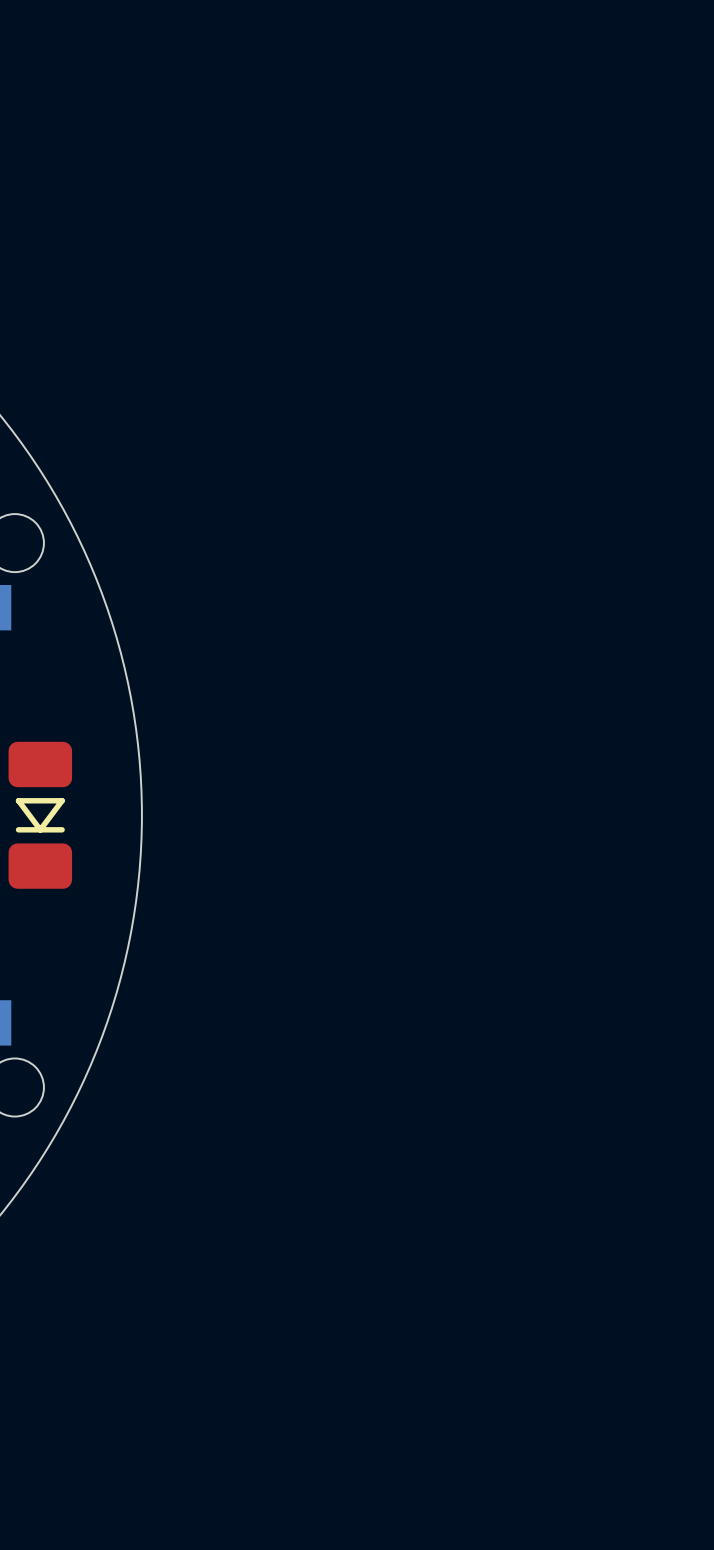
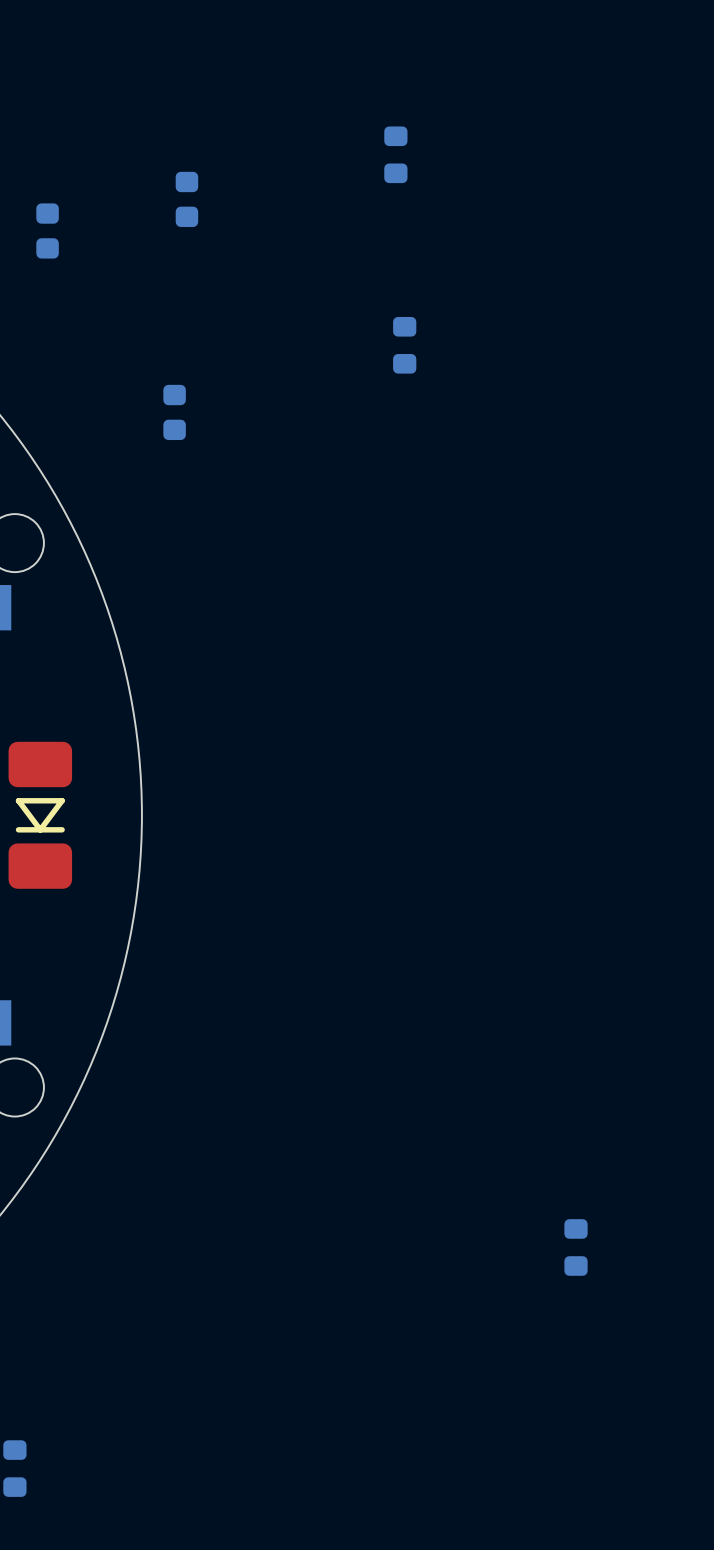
part: none -> (395, 154)
part: none -> (186, 199)
part: none -> (47, 230)
part: none -> (404, 345)
part: none -> (174, 412)
part: none -> (576, 1247)
part: none -> (14, 1468)

